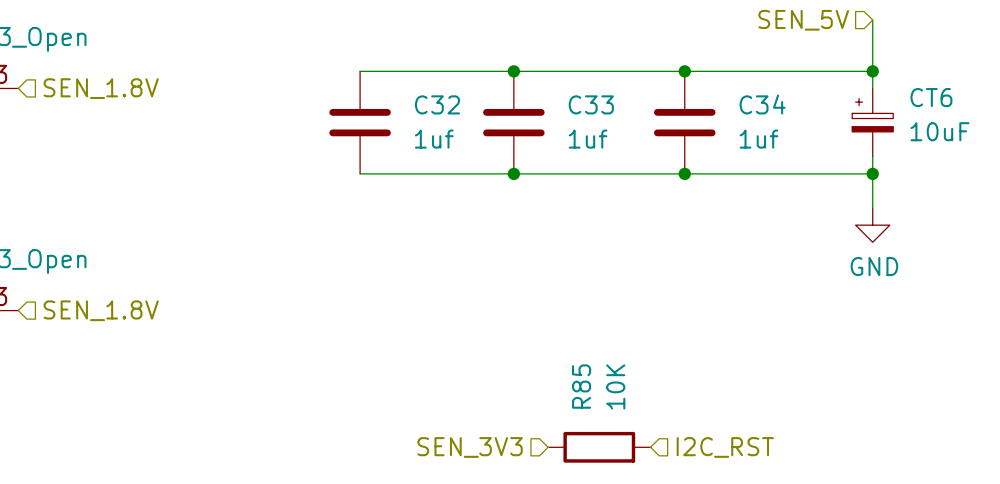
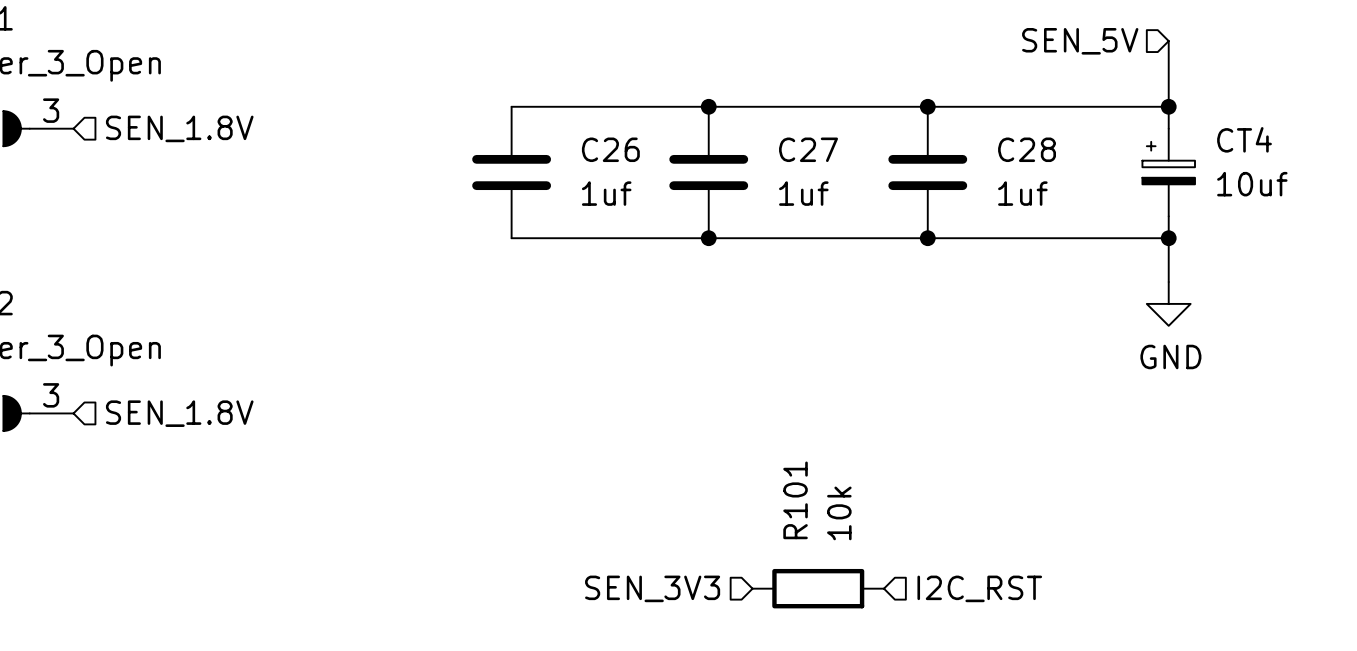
CT6 name: CT6 (931, 97) -> CT4 (1244, 139)
C32 name: C32 (437, 104) -> C26 (610, 149)
C33 name: C33 (591, 104) -> C27 (808, 149)
C34 name: C34 (762, 104) -> C28 (1027, 149)
CT6 value: 10uF (939, 131) -> 10uf (1252, 184)
R85 name: R85 (581, 386) -> R101 (795, 500)
R85 value: 10K (615, 386) -> 10k (839, 513)

